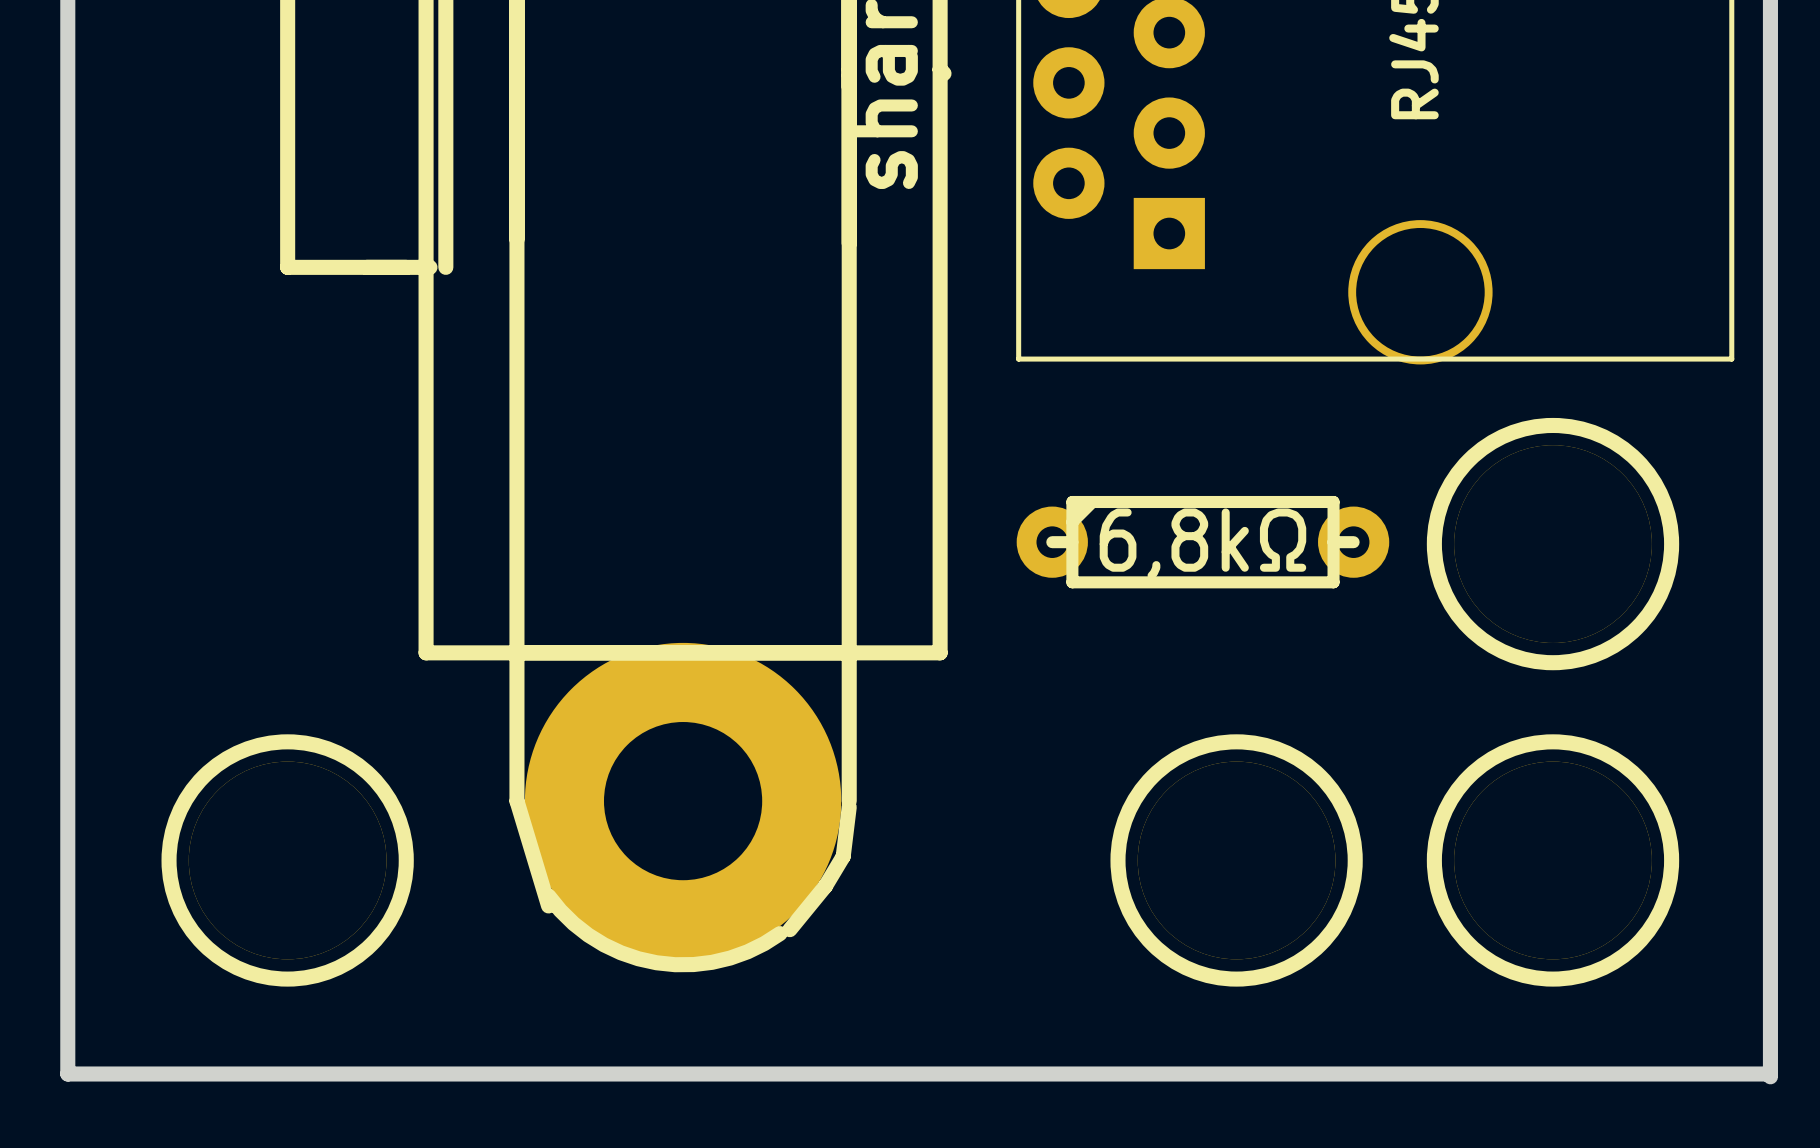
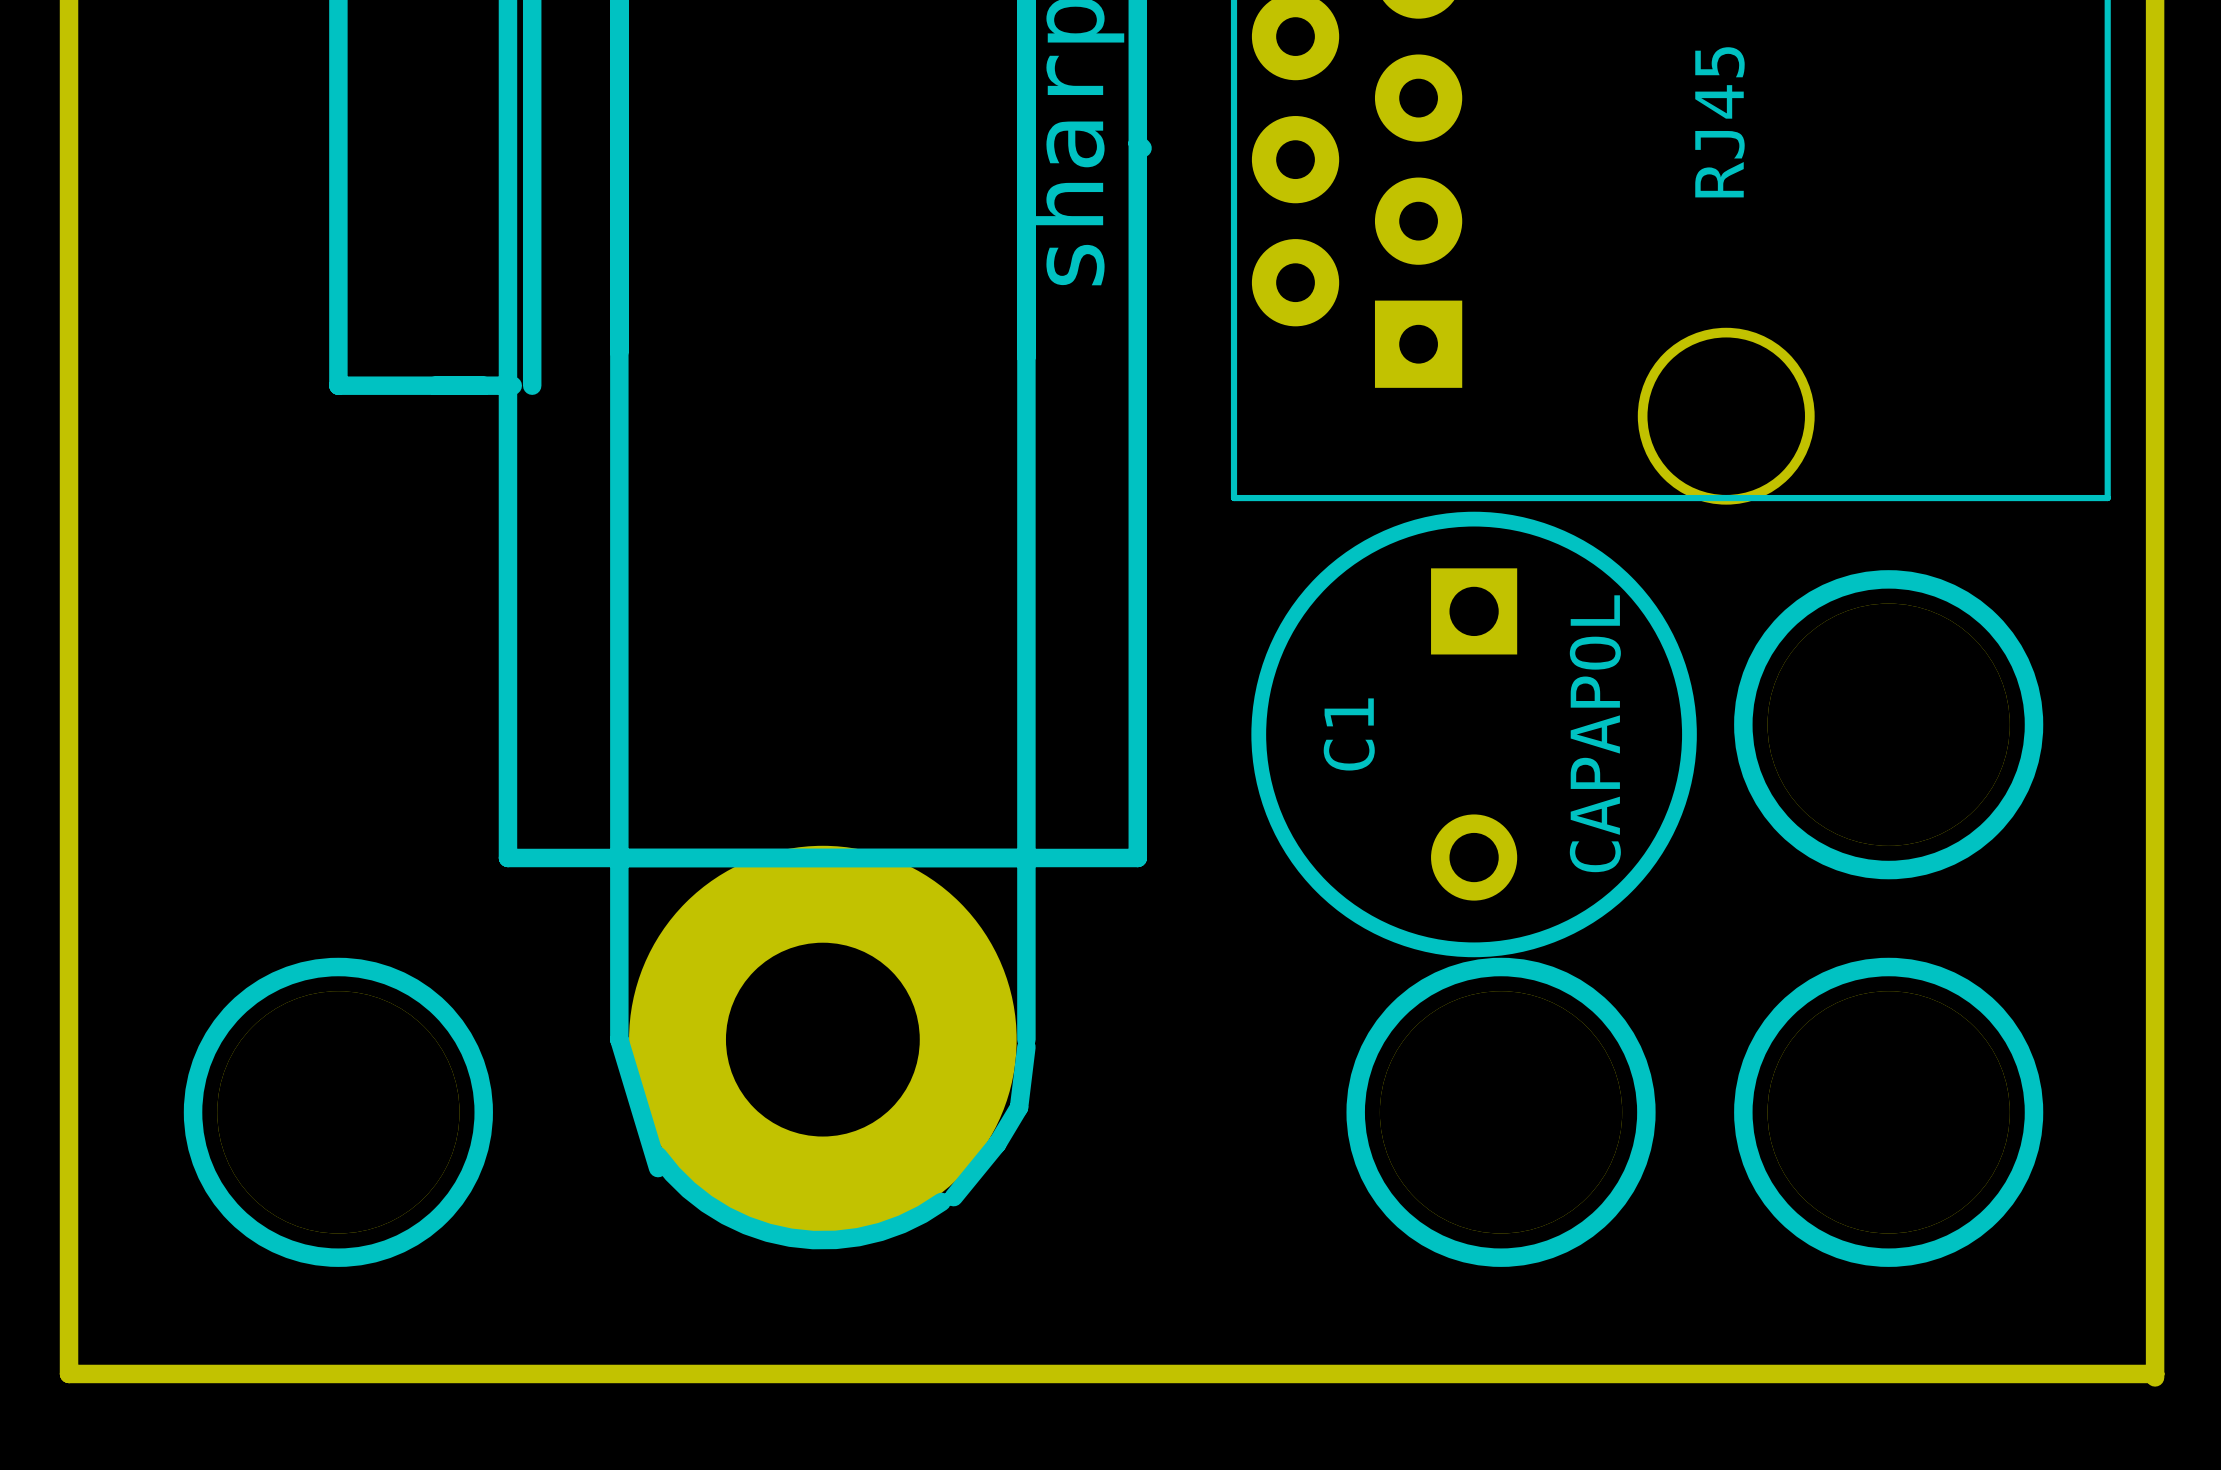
part: 6,8kΩ (1202, 542) -> none
C1: none -> CAPAPOL (1474, 734)

